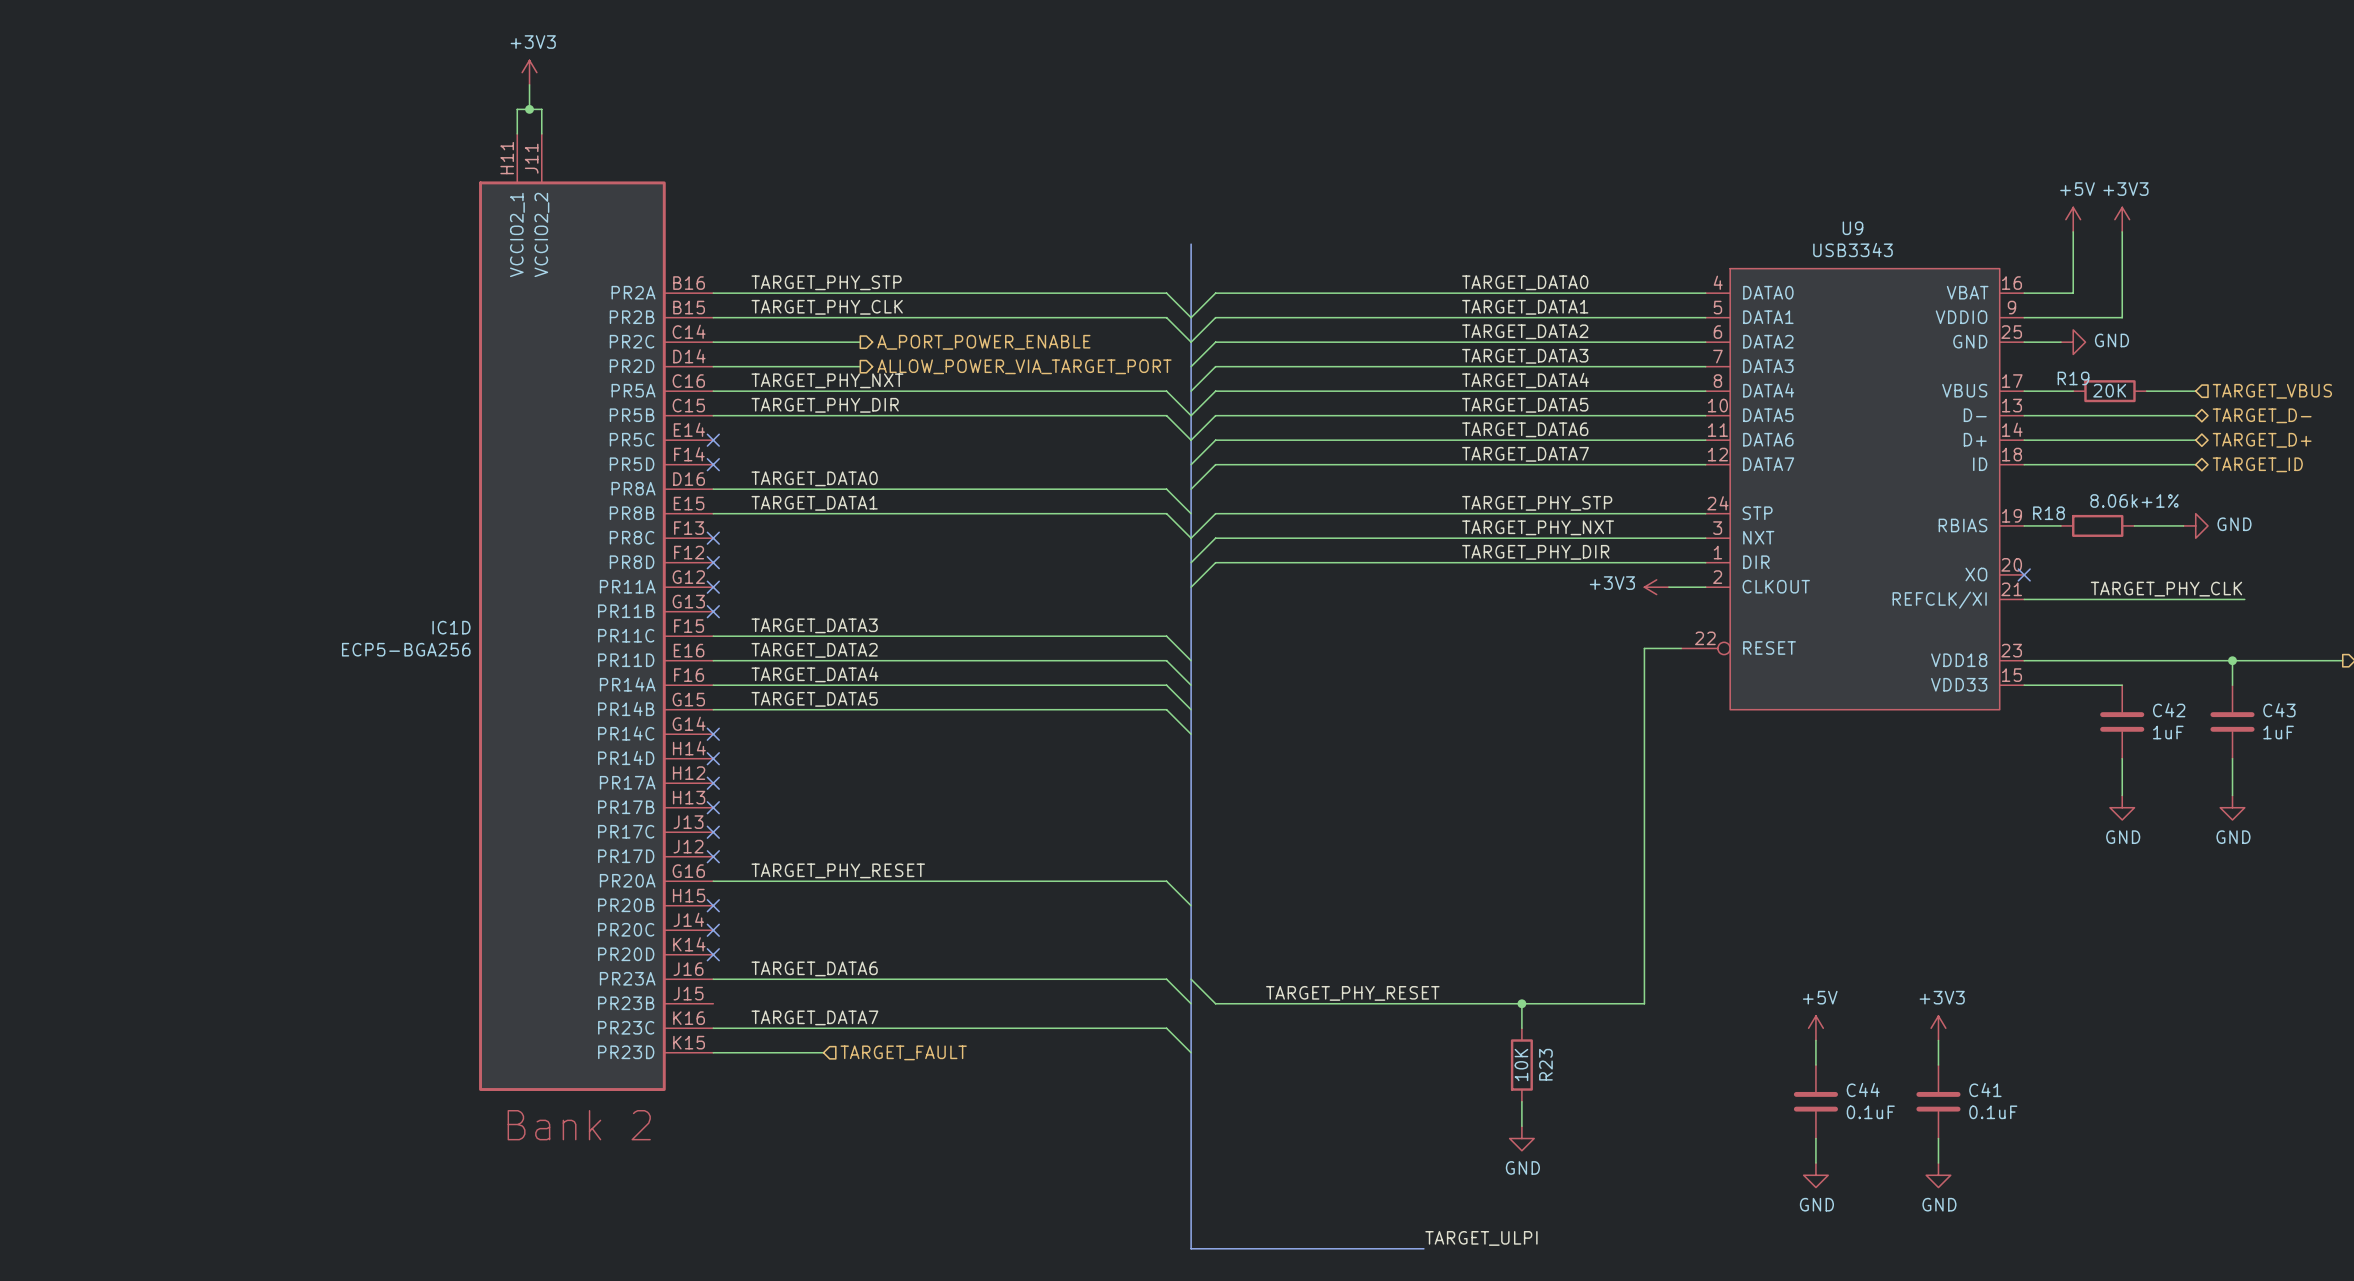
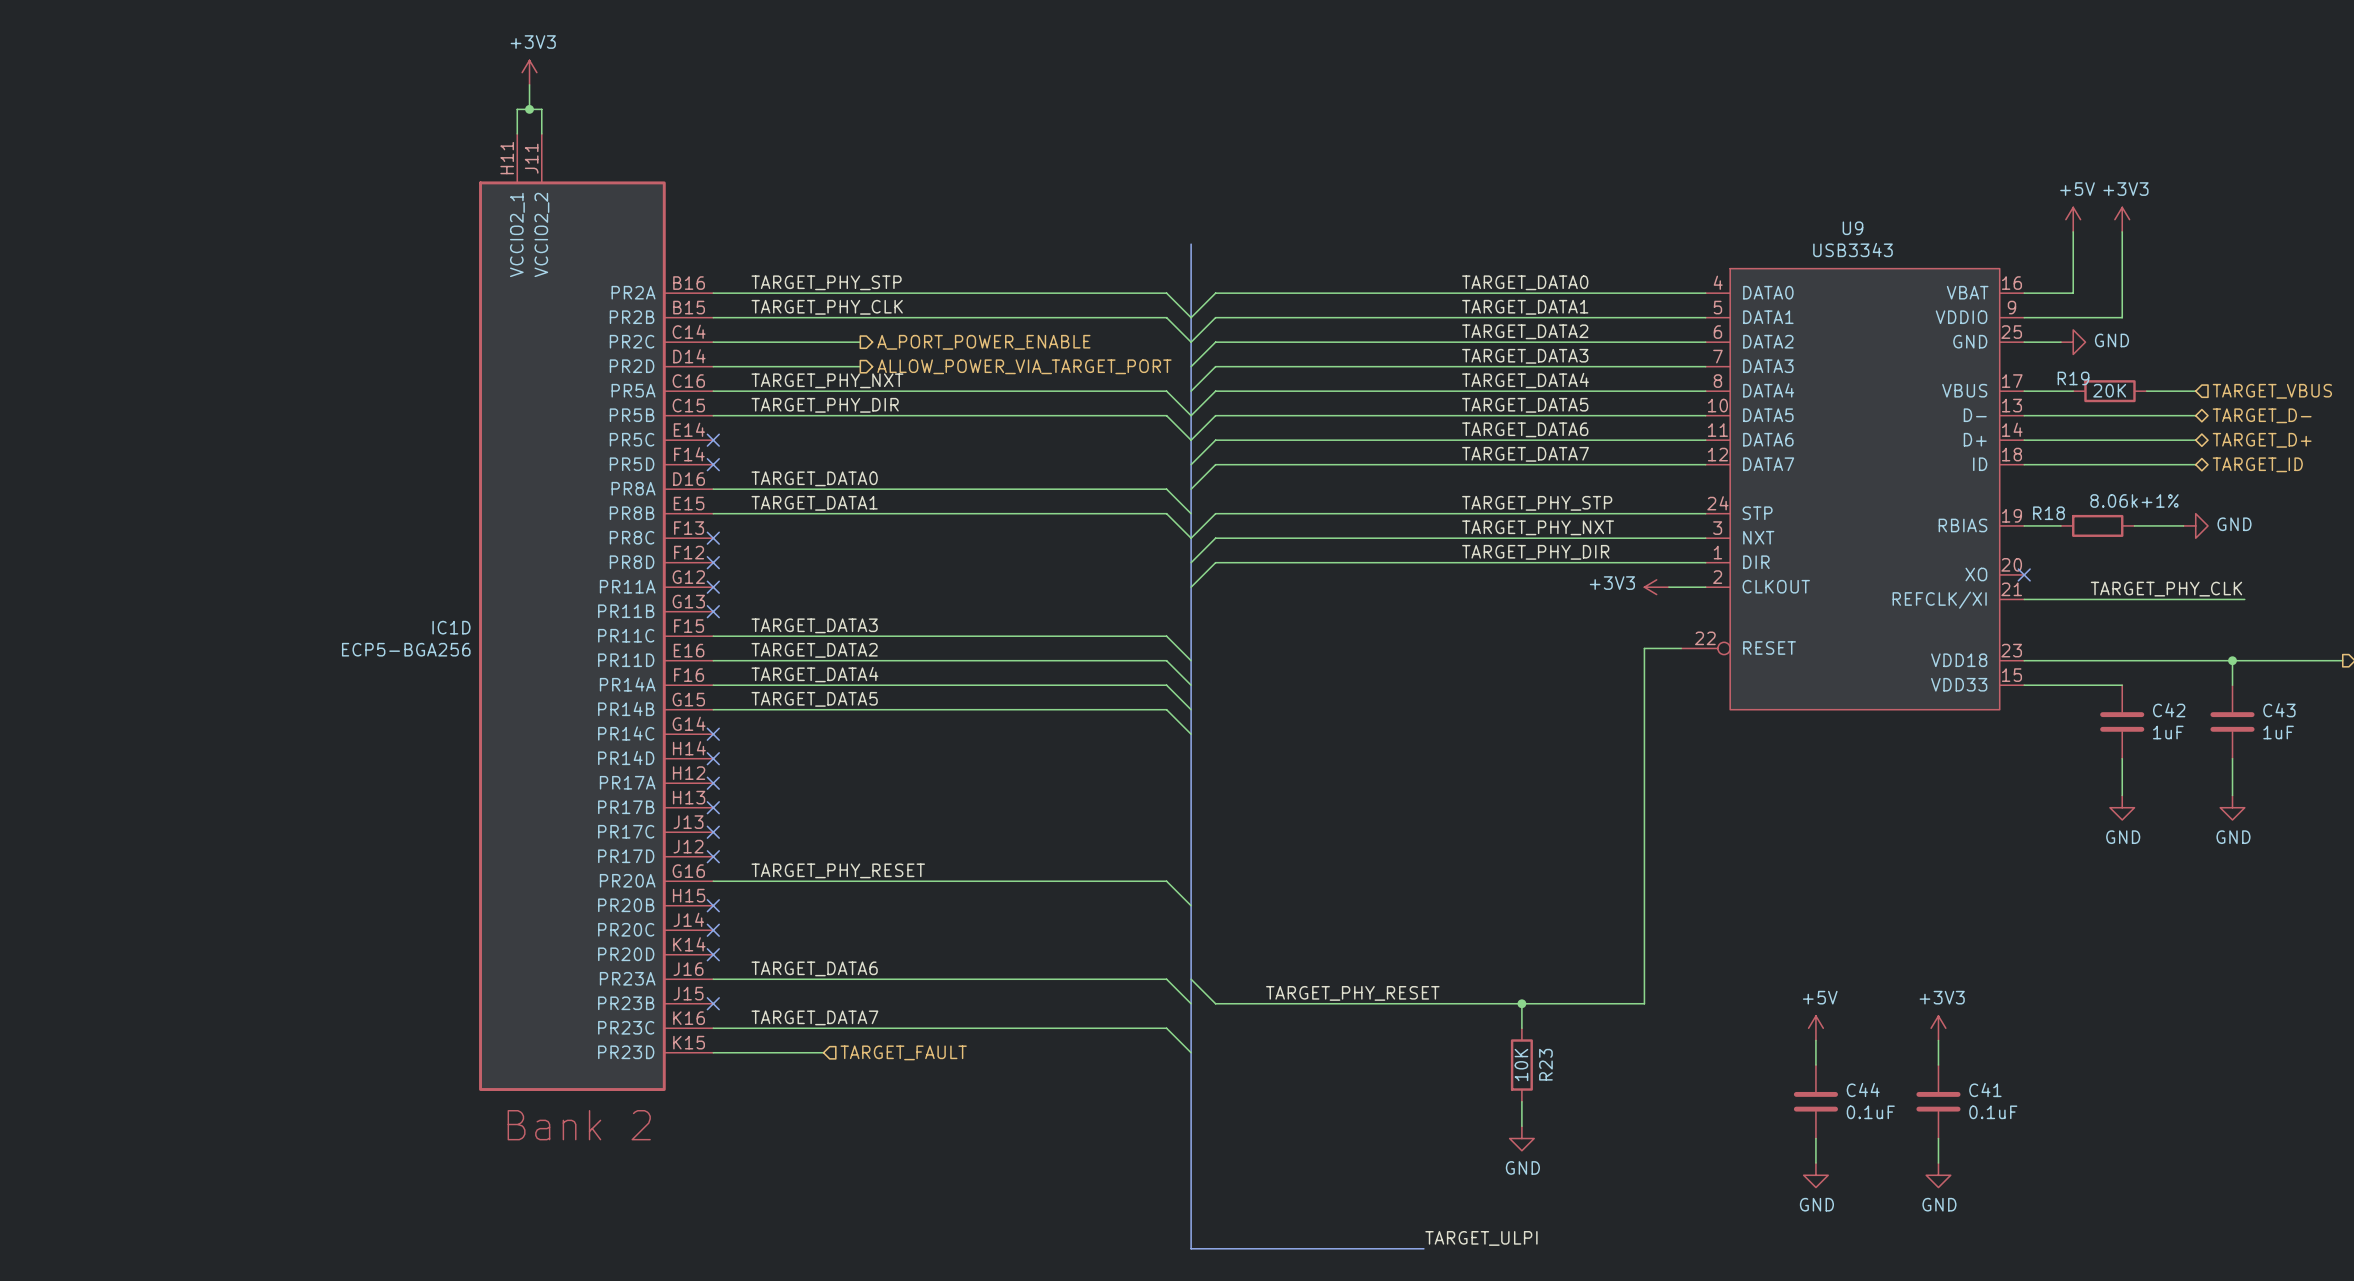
no-connect mark: none -> (713, 1003)

